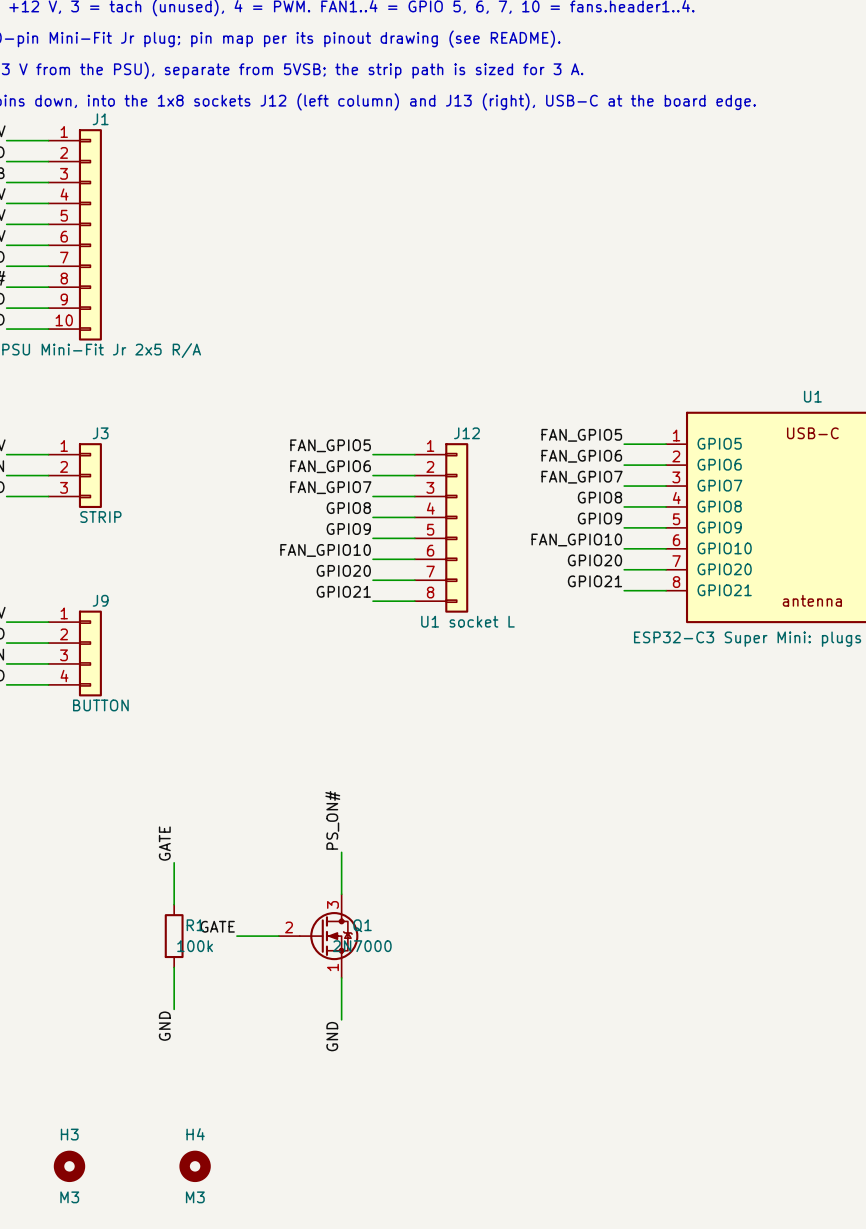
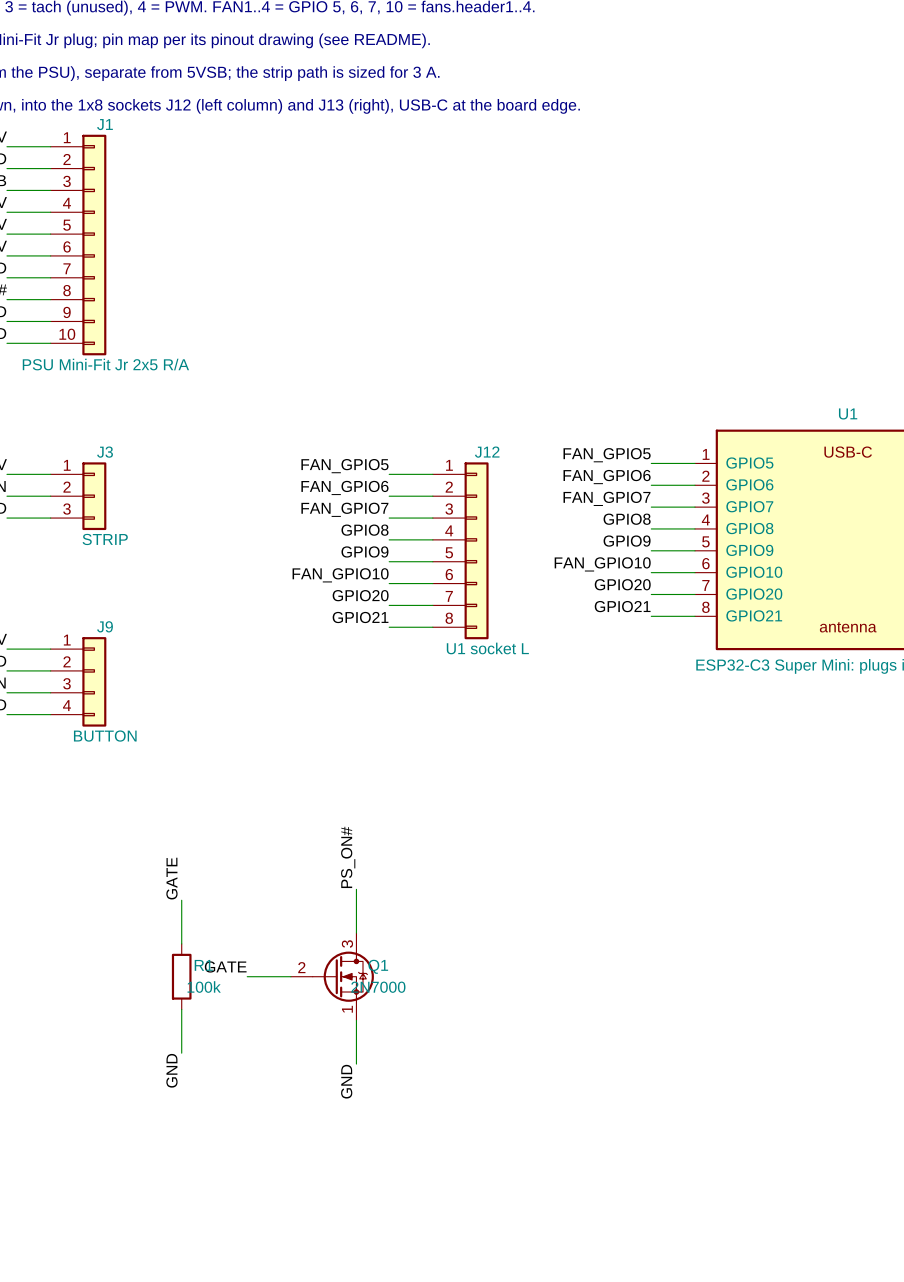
H3: M3 (69, 1166) -> none
H4: M3 (195, 1166) -> none

